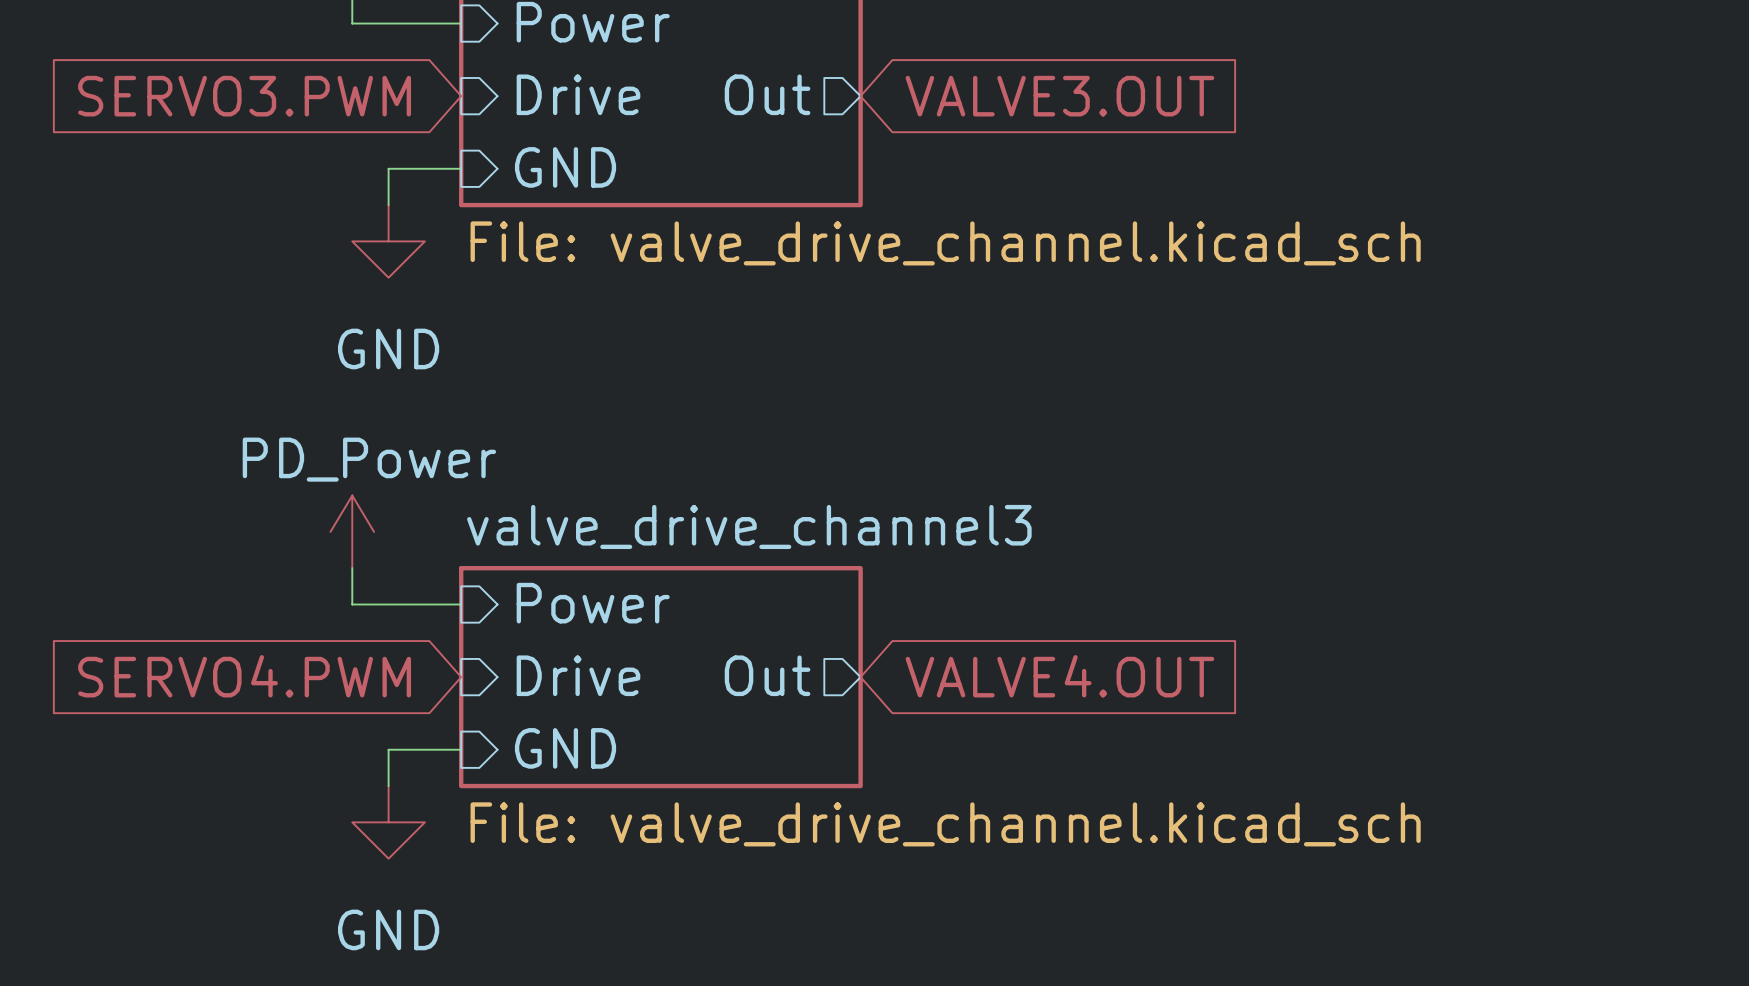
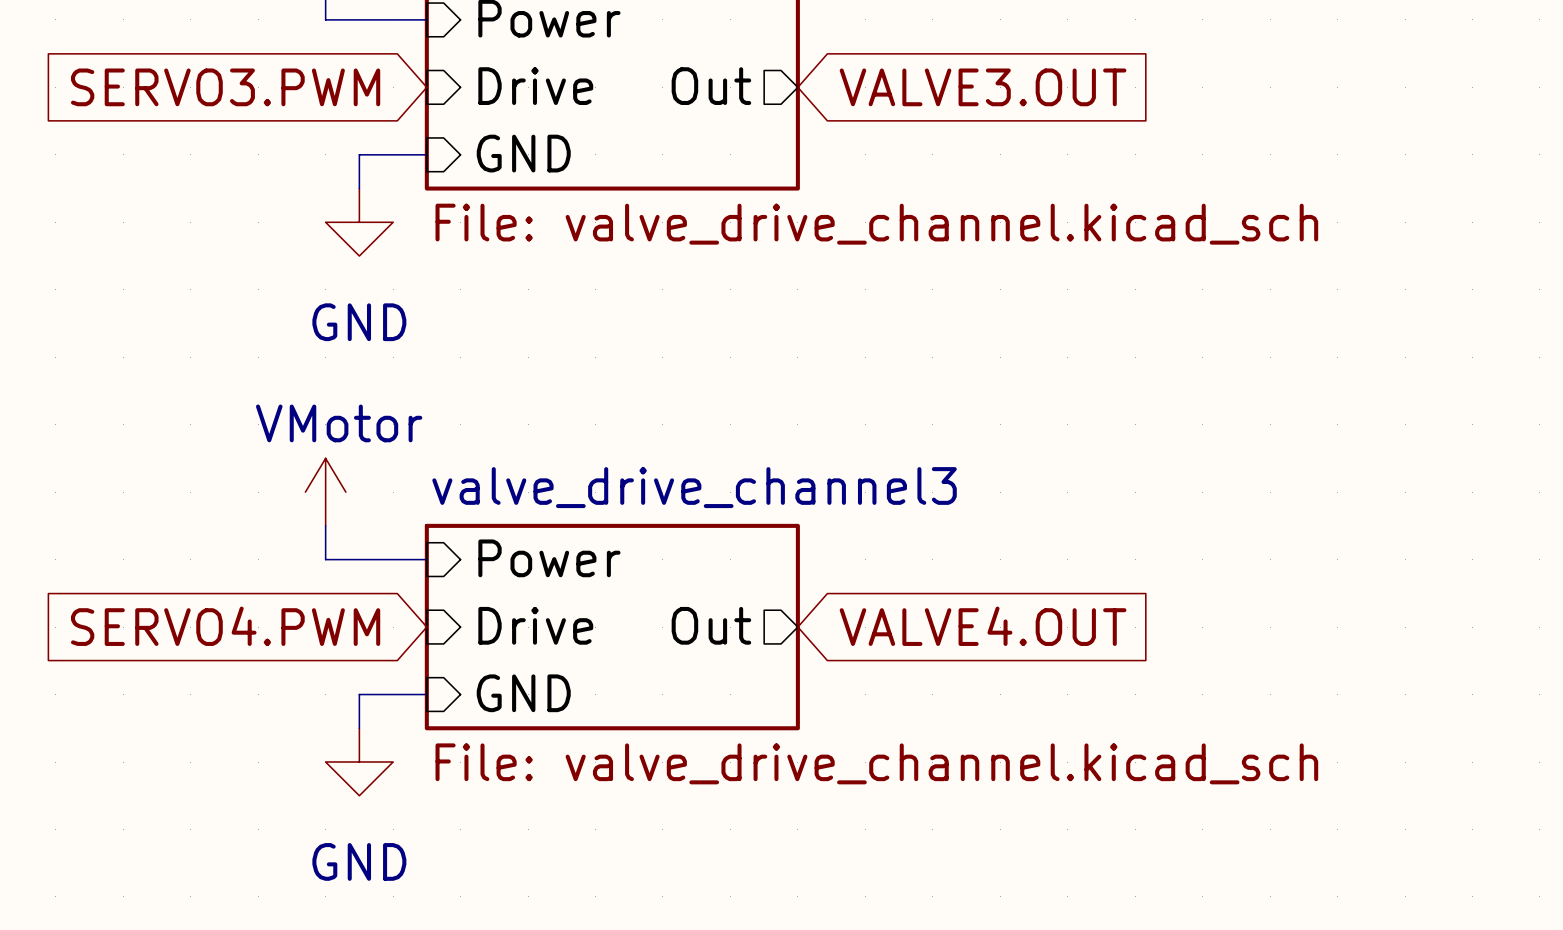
power symbol: PD_Power (352, 531) -> VMotor (325, 492)

